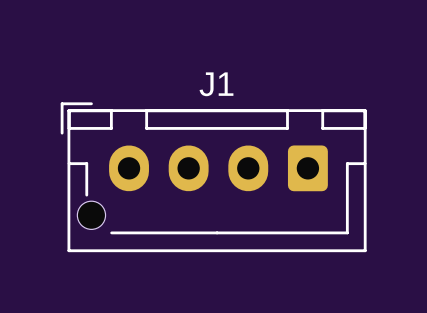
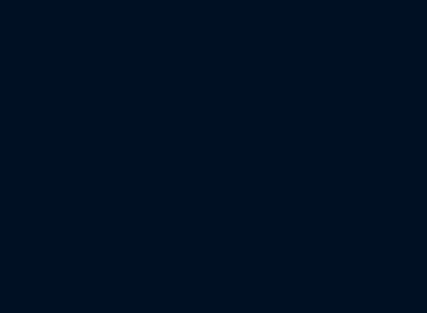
J1: (213, 177) -> none

